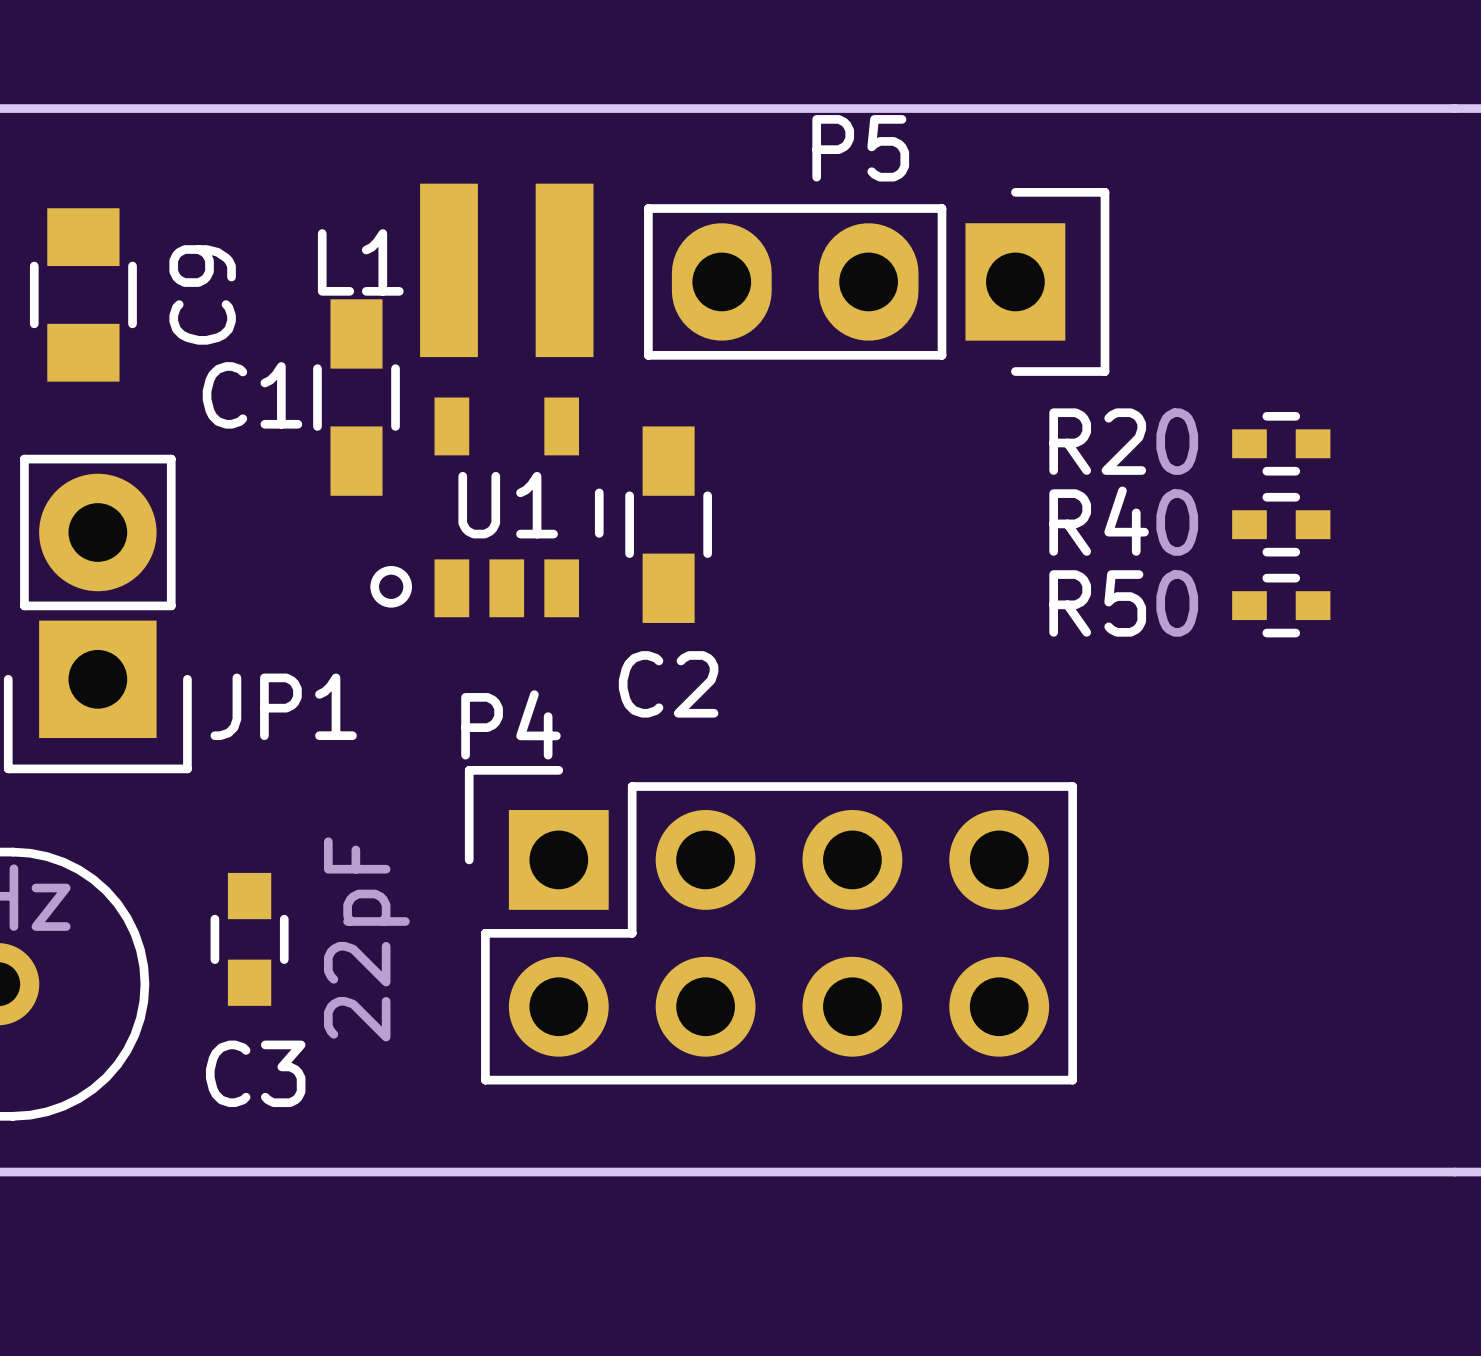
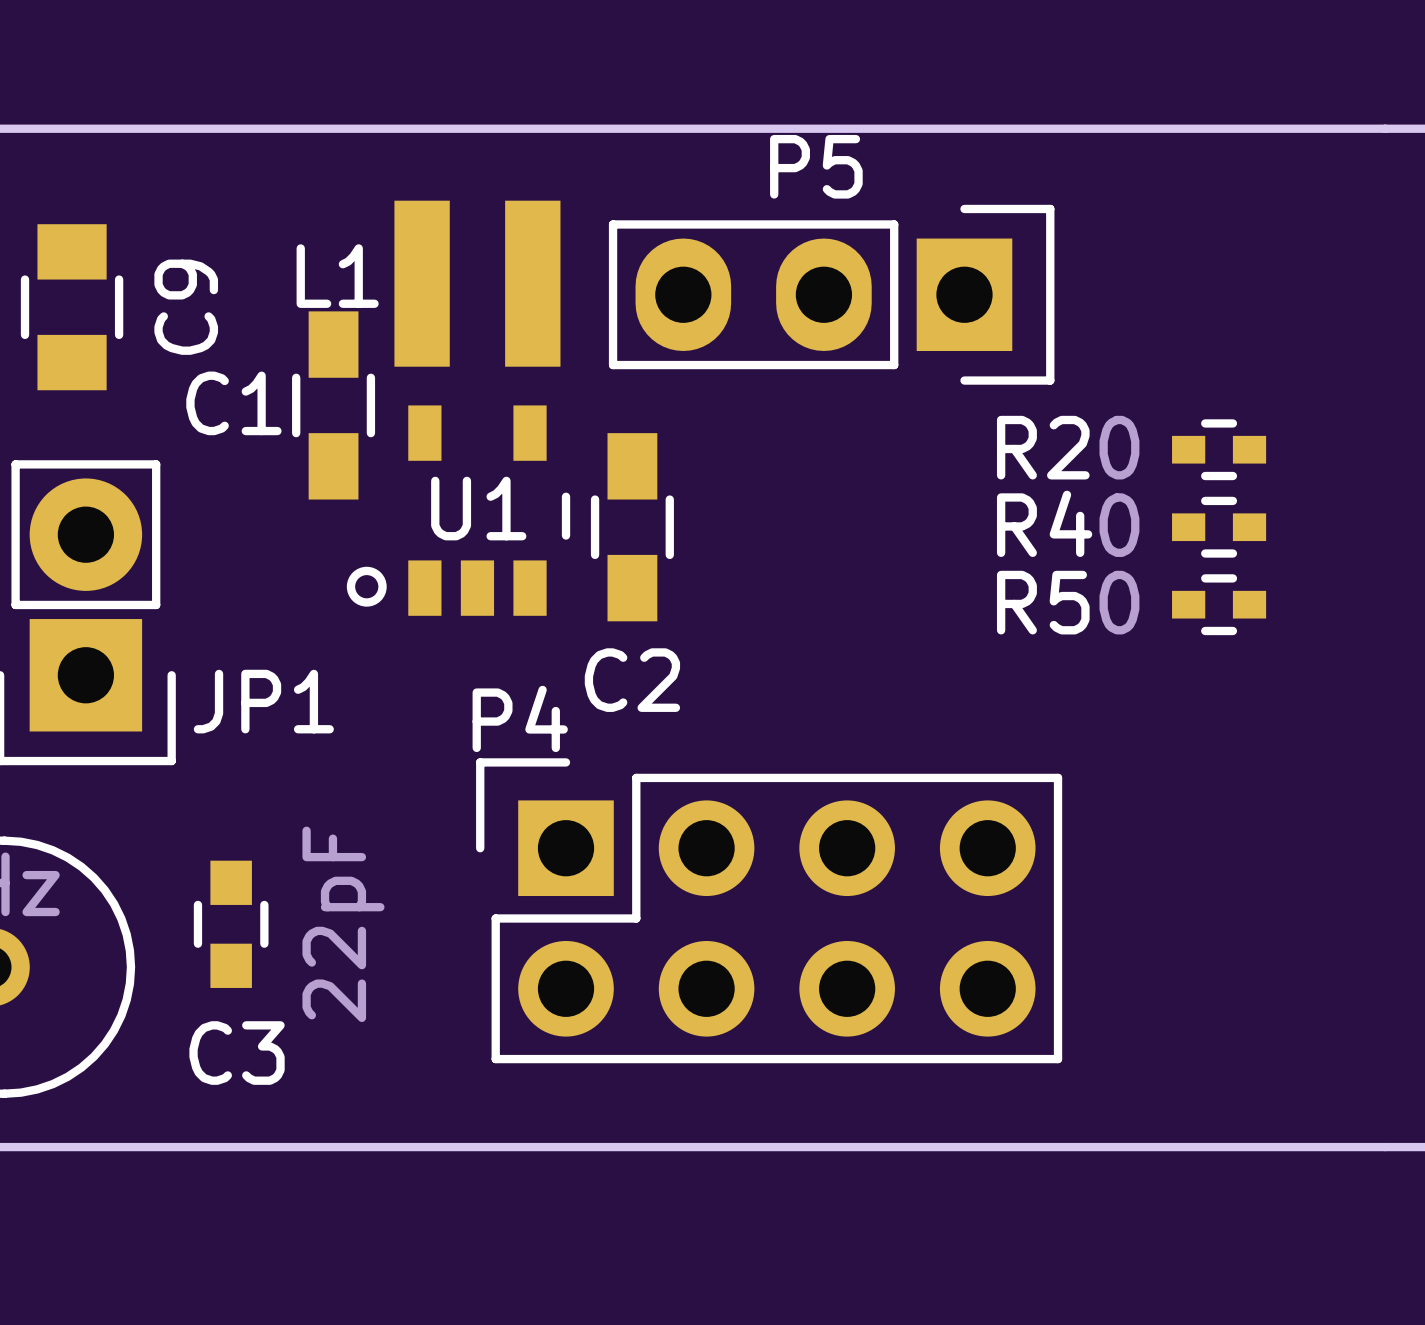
P4 position: (770, 925) -> (769, 910)

